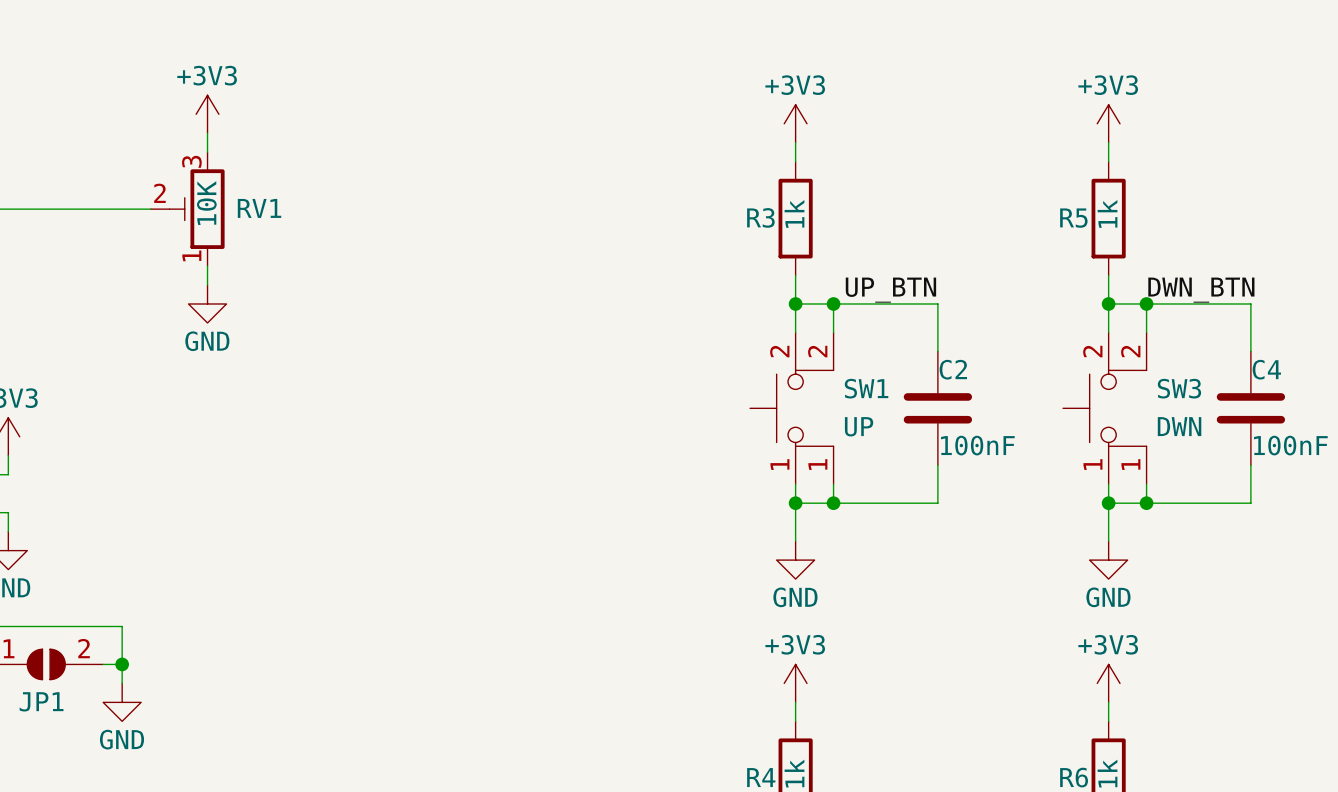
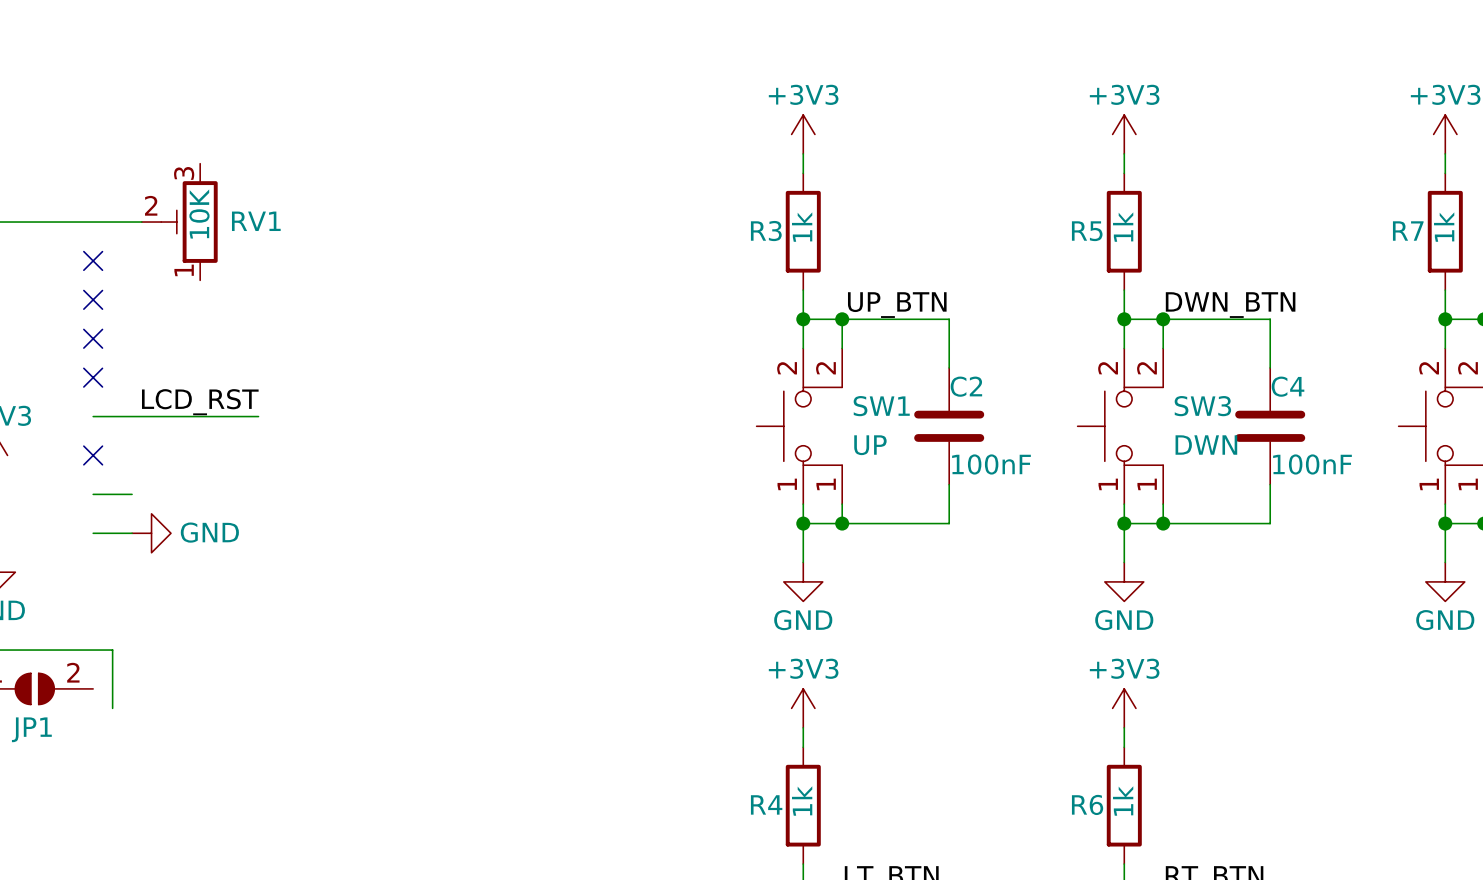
power symbol: +3V3 (207, 114) -> none
wire: (207, 133) (207, 152) -> none
no-connect mark: none -> (93, 260)
wire: (207, 266) (207, 285) -> none
no-connect mark: none -> (93, 299)
power symbol: GND (207, 303) -> none
no-connect mark: none -> (93, 338)
no-connect mark: none -> (93, 377)
label: none -> LCD_RST (200, 402)
wire: none -> (93, 416) (258, 416)
no-connect mark: none -> (93, 455)
wire: none -> (93, 494) (132, 494)
wire: none -> (93, 533) (132, 533)
power symbol: none -> GND (151, 533)
wire: (103, 664) (122, 664) -> none
junction: (122, 664) -> none
power symbol: GND (122, 702) -> none

